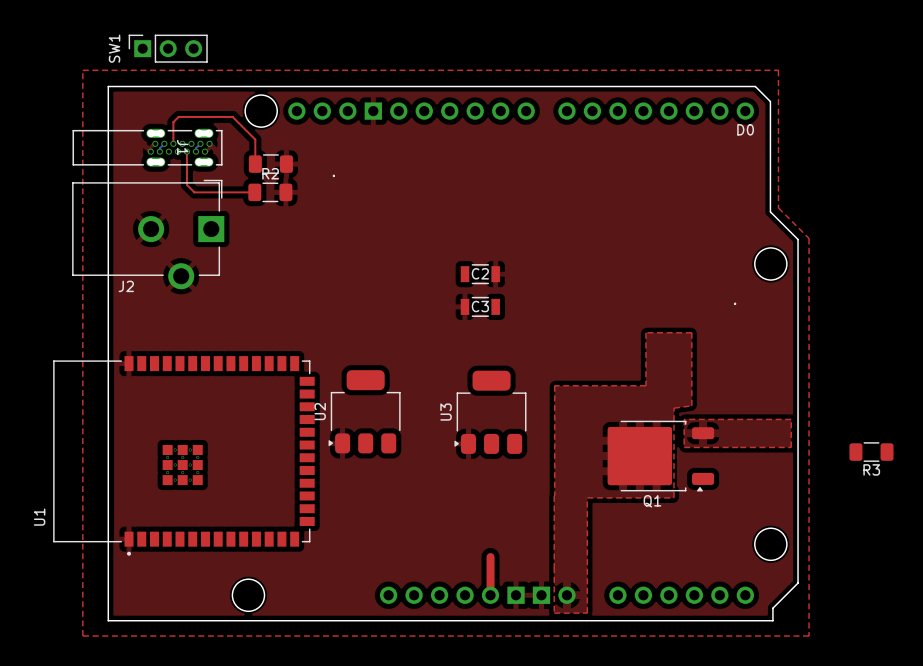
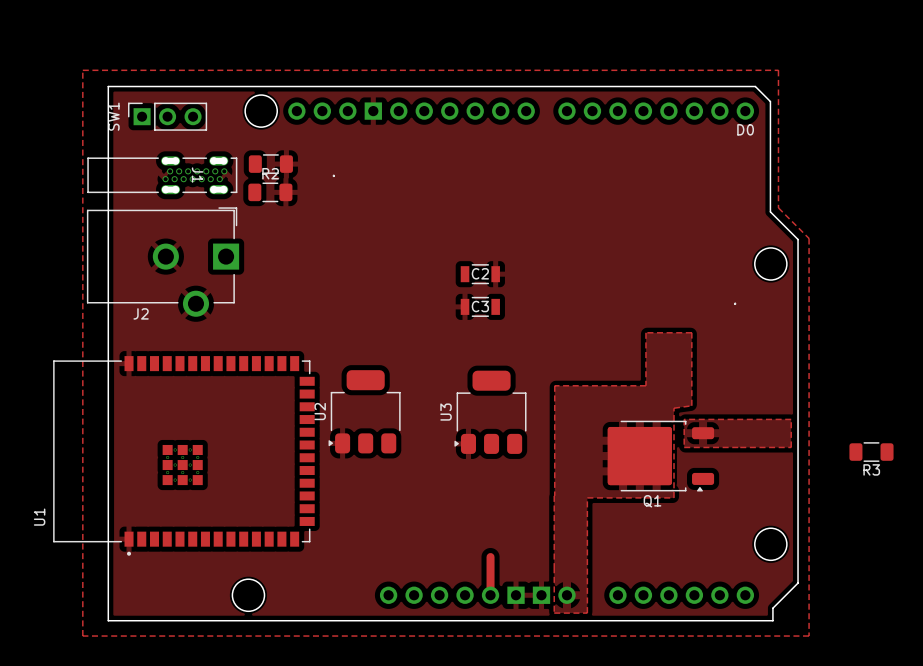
SW1 position: (168, 48) -> (167, 116)
bottom track: (164, 143) (159, 148) (159, 151) -> none
top track: (173, 143) (173, 122) (178, 116) (232, 116) (255, 139) (255, 164) -> none
bottom track: (200, 143) (195, 148) (195, 151) -> none
J1 position: (147, 147) -> (162, 175)
top track: (186, 151) (186, 184) (194, 192) (254, 192) -> none
J2 position: (148, 234) -> (163, 262)

